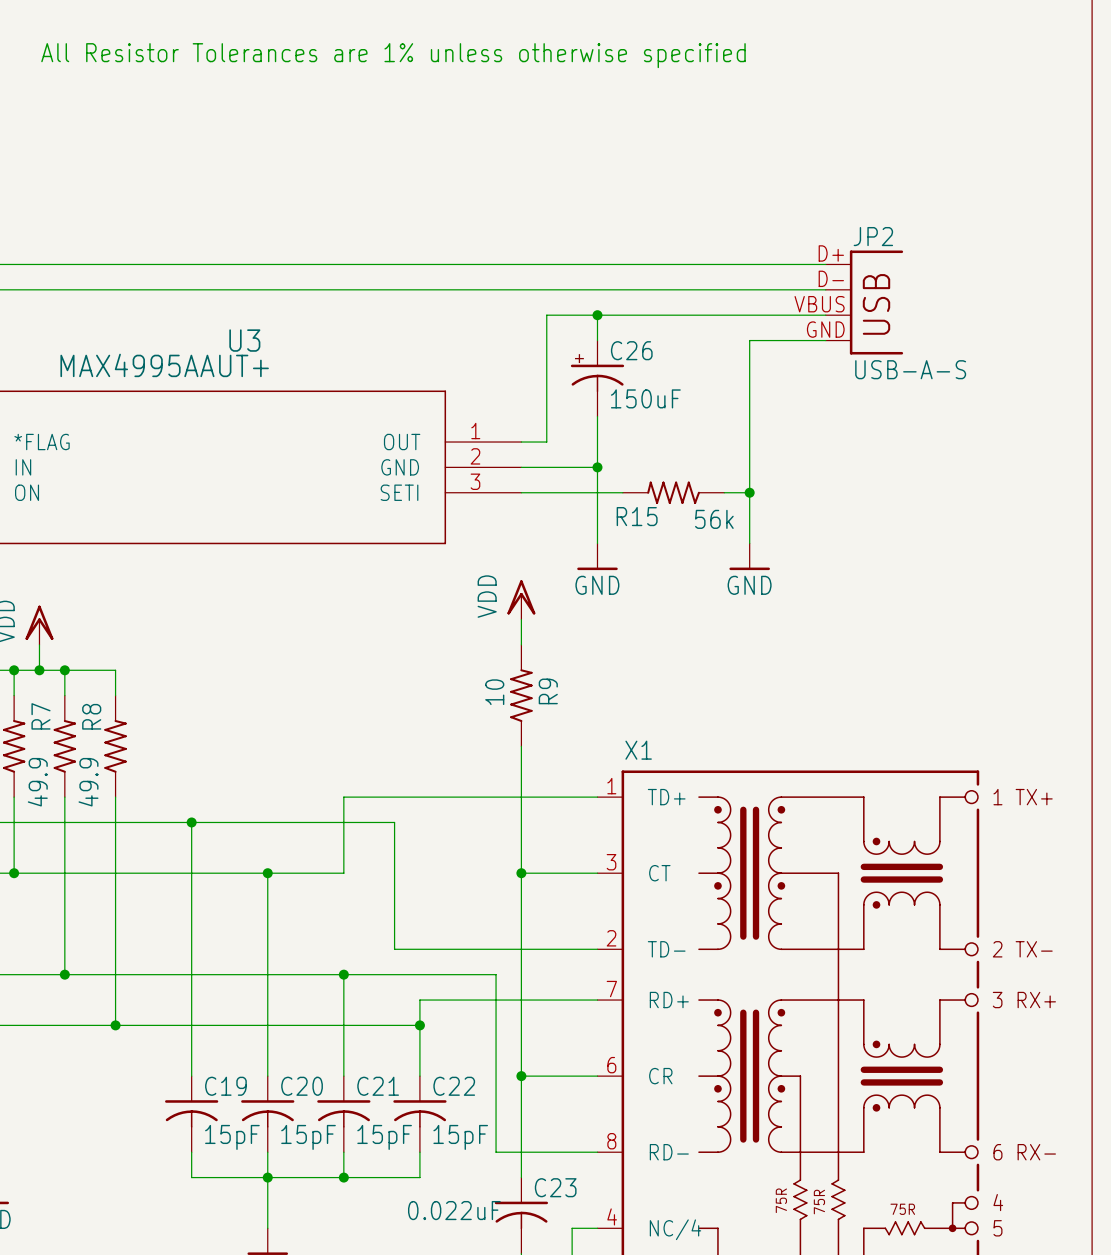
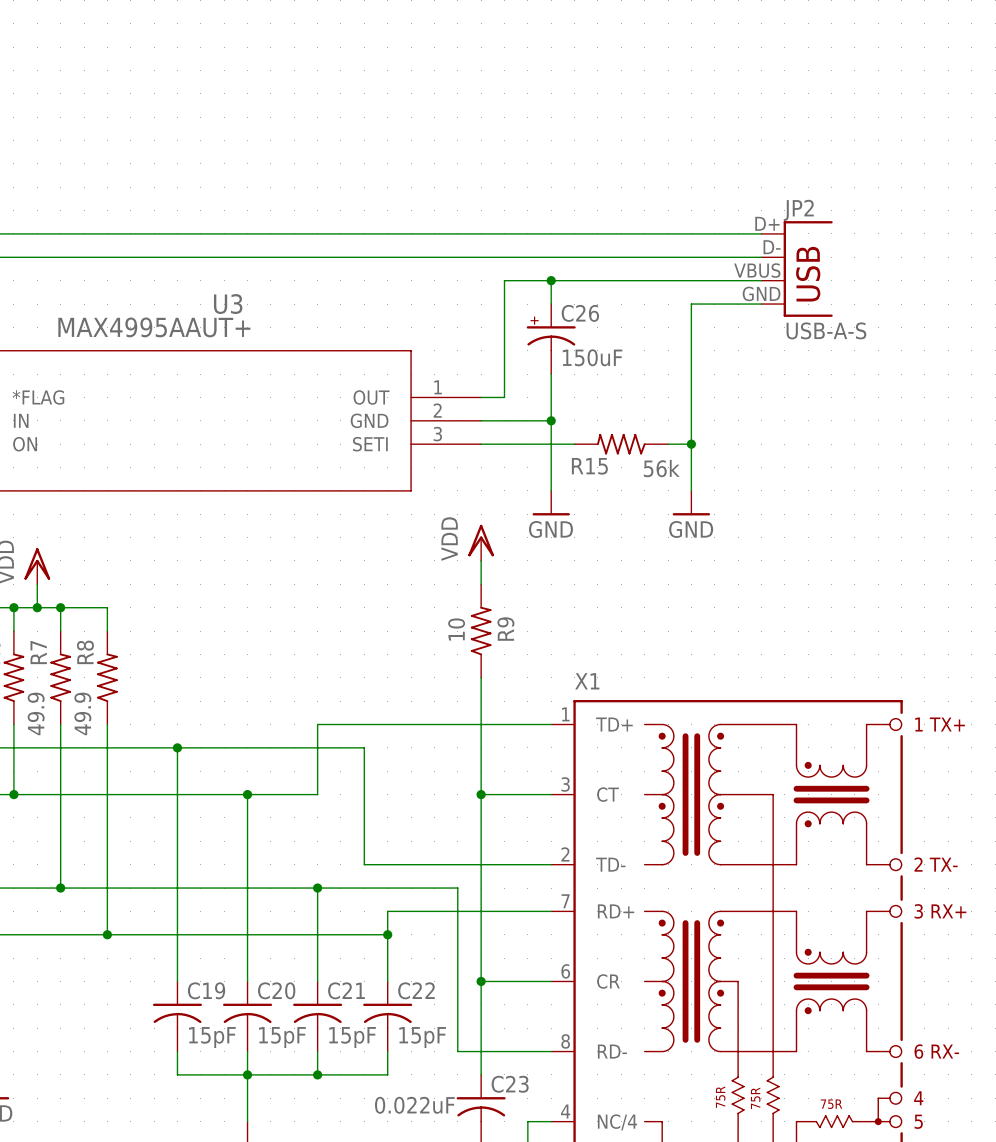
text: All Resistor Tolerances are 1% unless otherwise specified (393, 55) -> none

